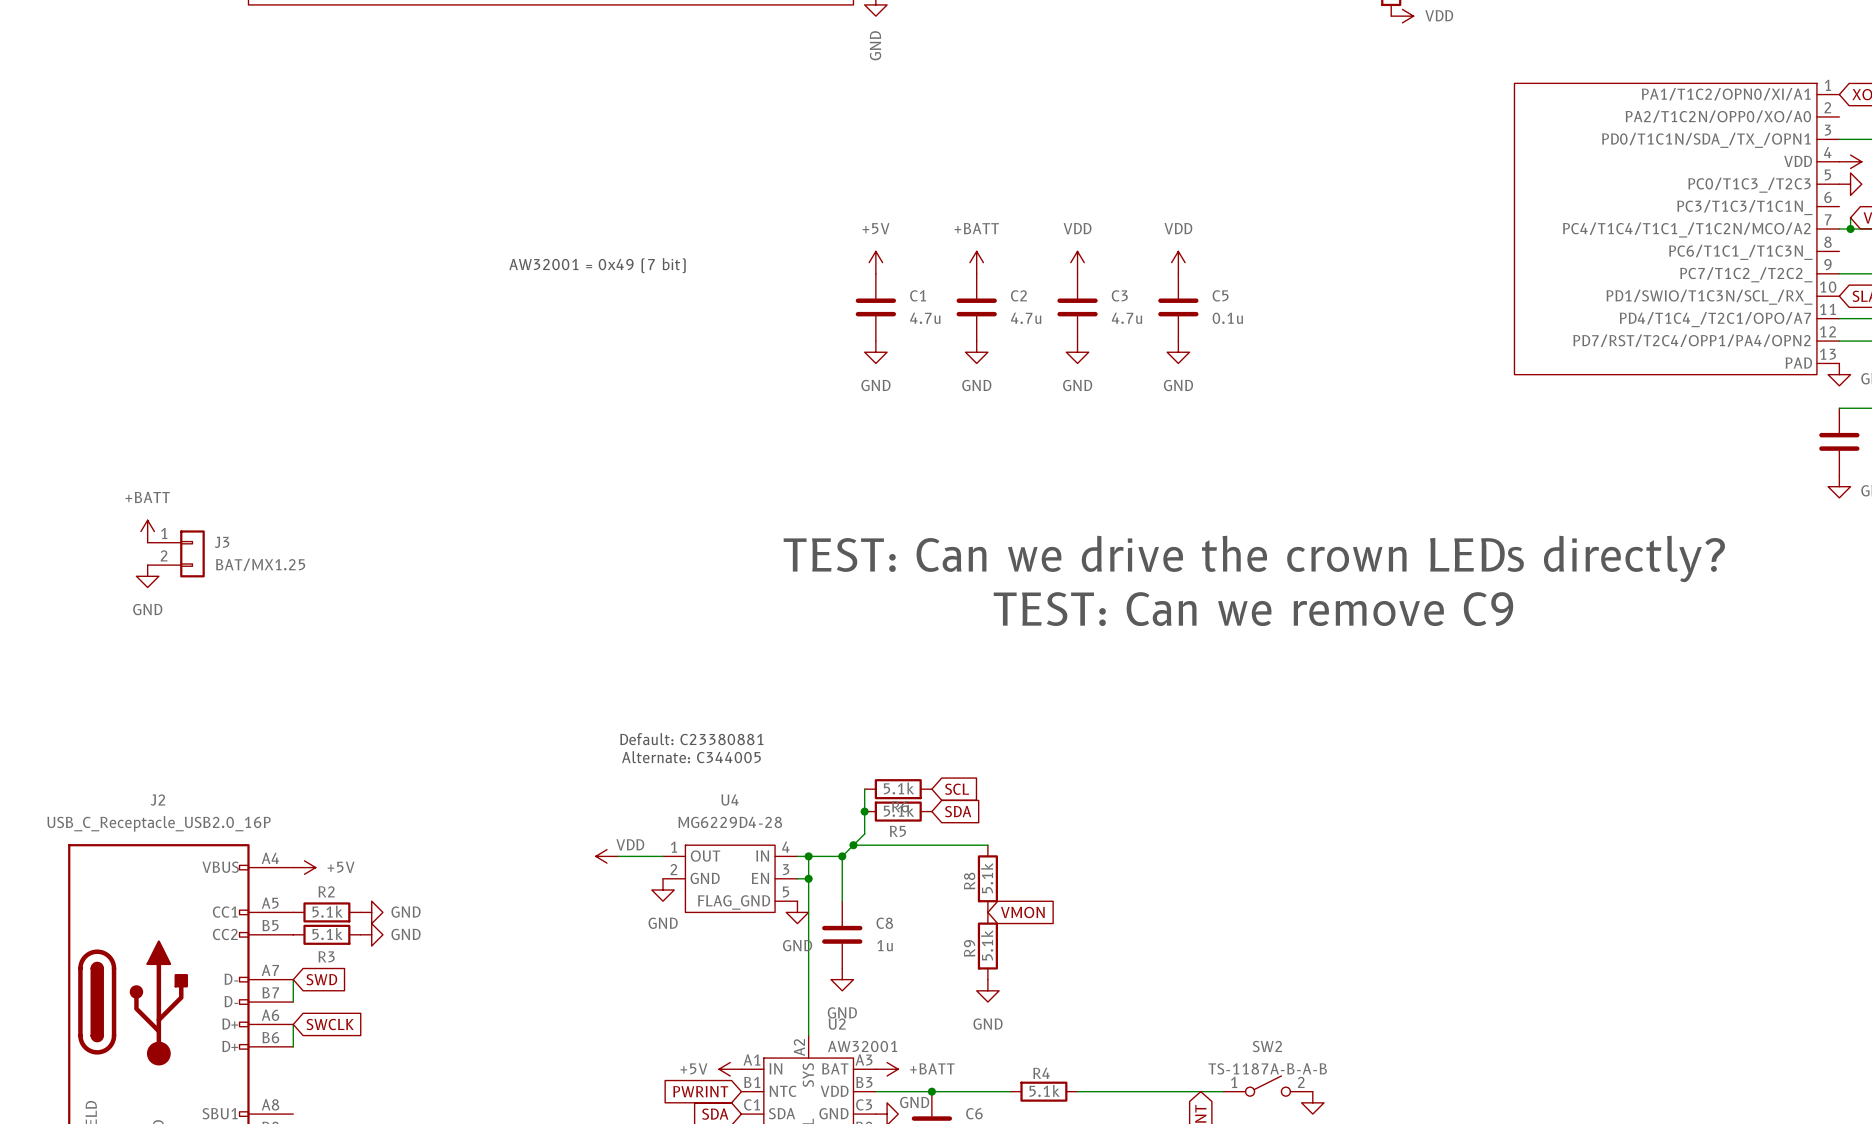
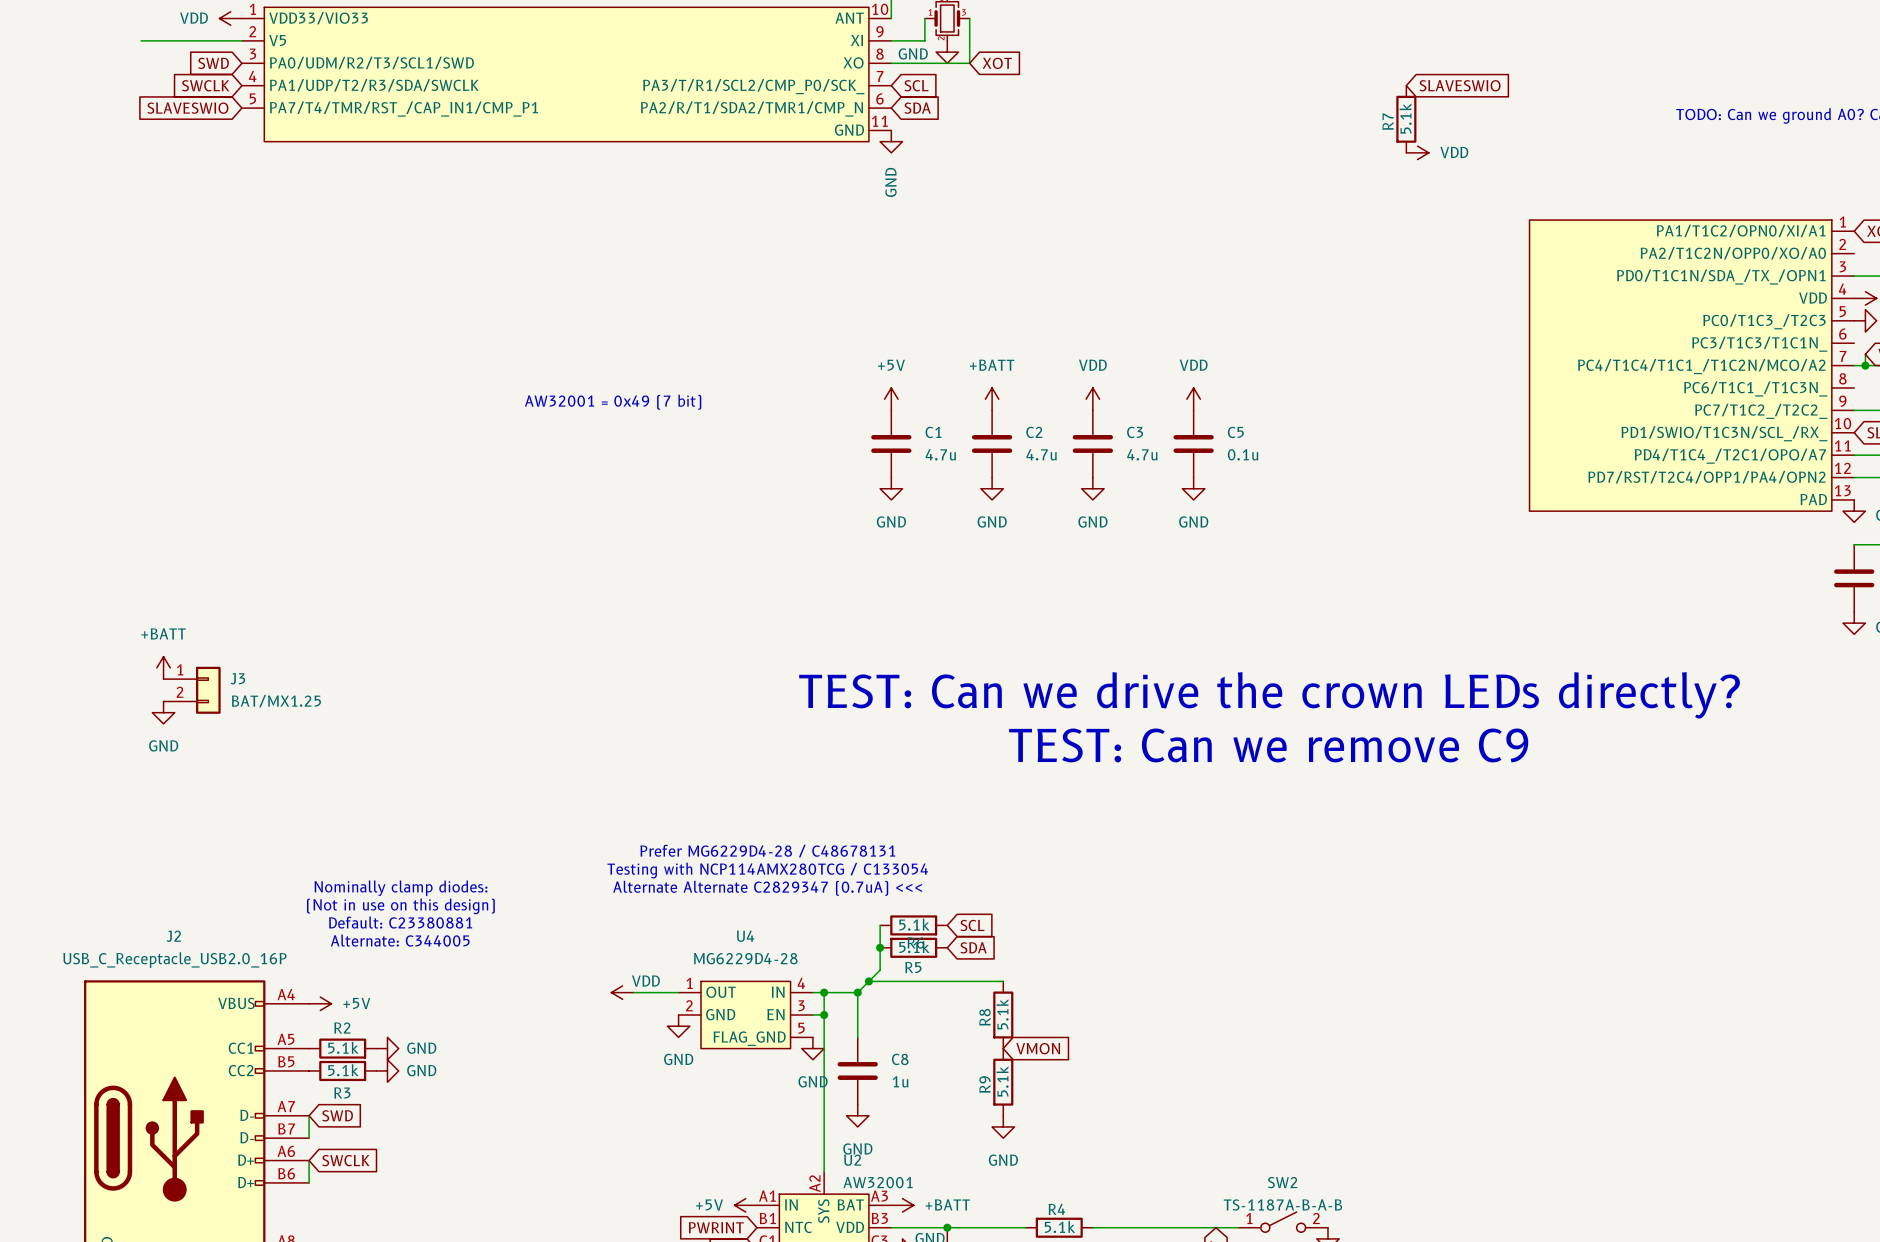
text: none -> Prefer MG6229D4-28 / C48678131 (767, 851)
text: none -> Testing with NCP114AMX280TCG / C133054 (767, 870)
text: Default: C23380881 (691, 739) -> none
text: none -> Alternate Alternate C2829347 (0.7uA) <<< (767, 888)
text: none -> Nominally clamp diodes: (400, 888)
text: Alternate: C344005 (691, 757) -> none
text: none -> (Not in use on this design) (400, 906)
text: none -> Default: C23380881 (400, 922)
text: none -> Alternate: C344005 (400, 940)

